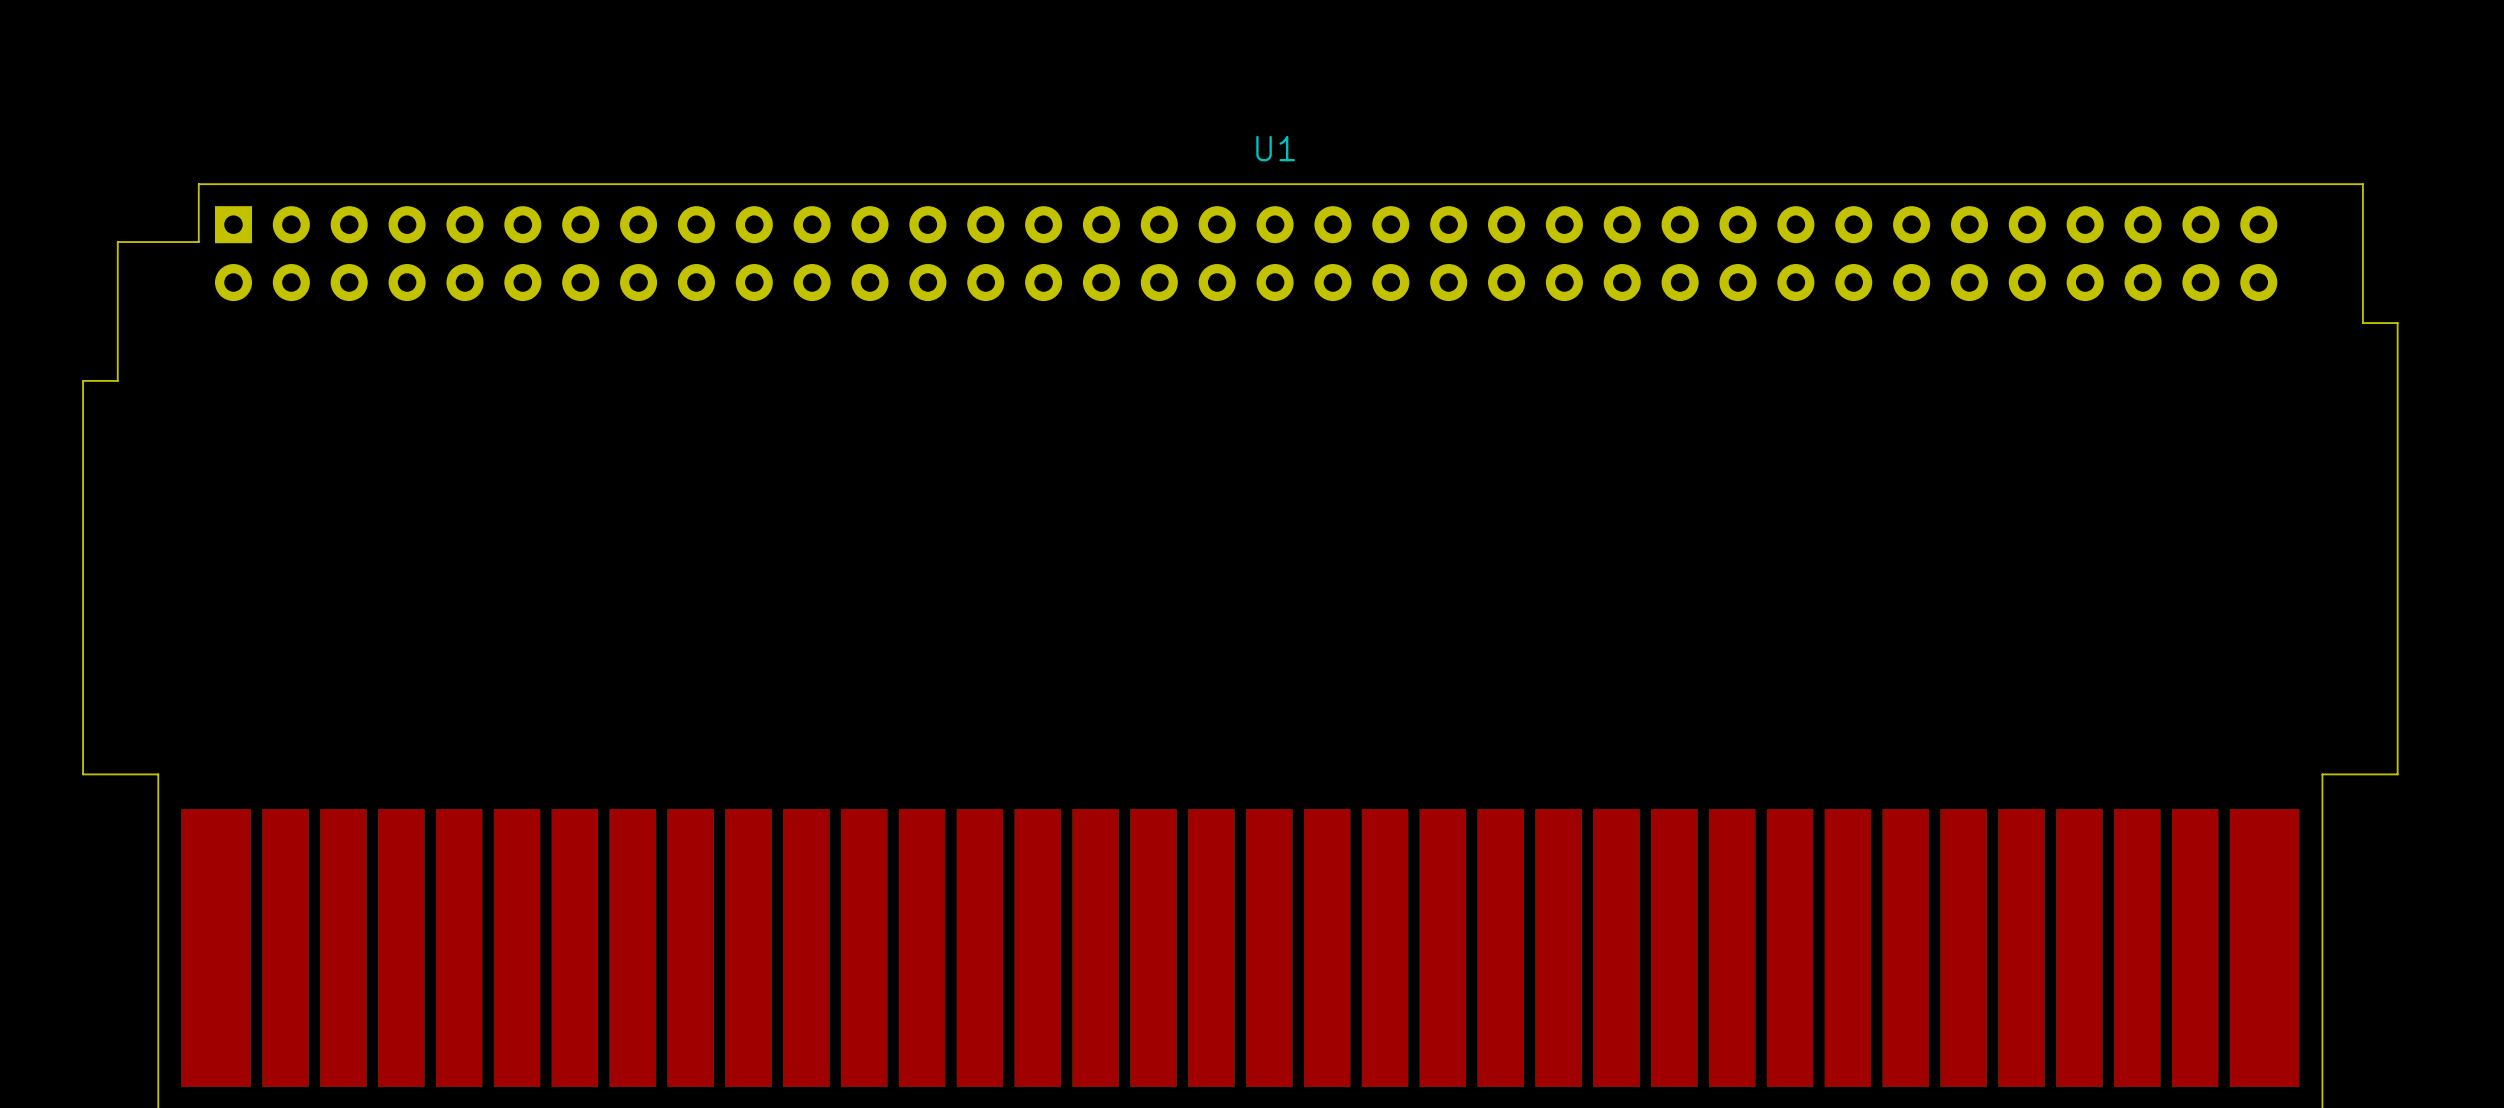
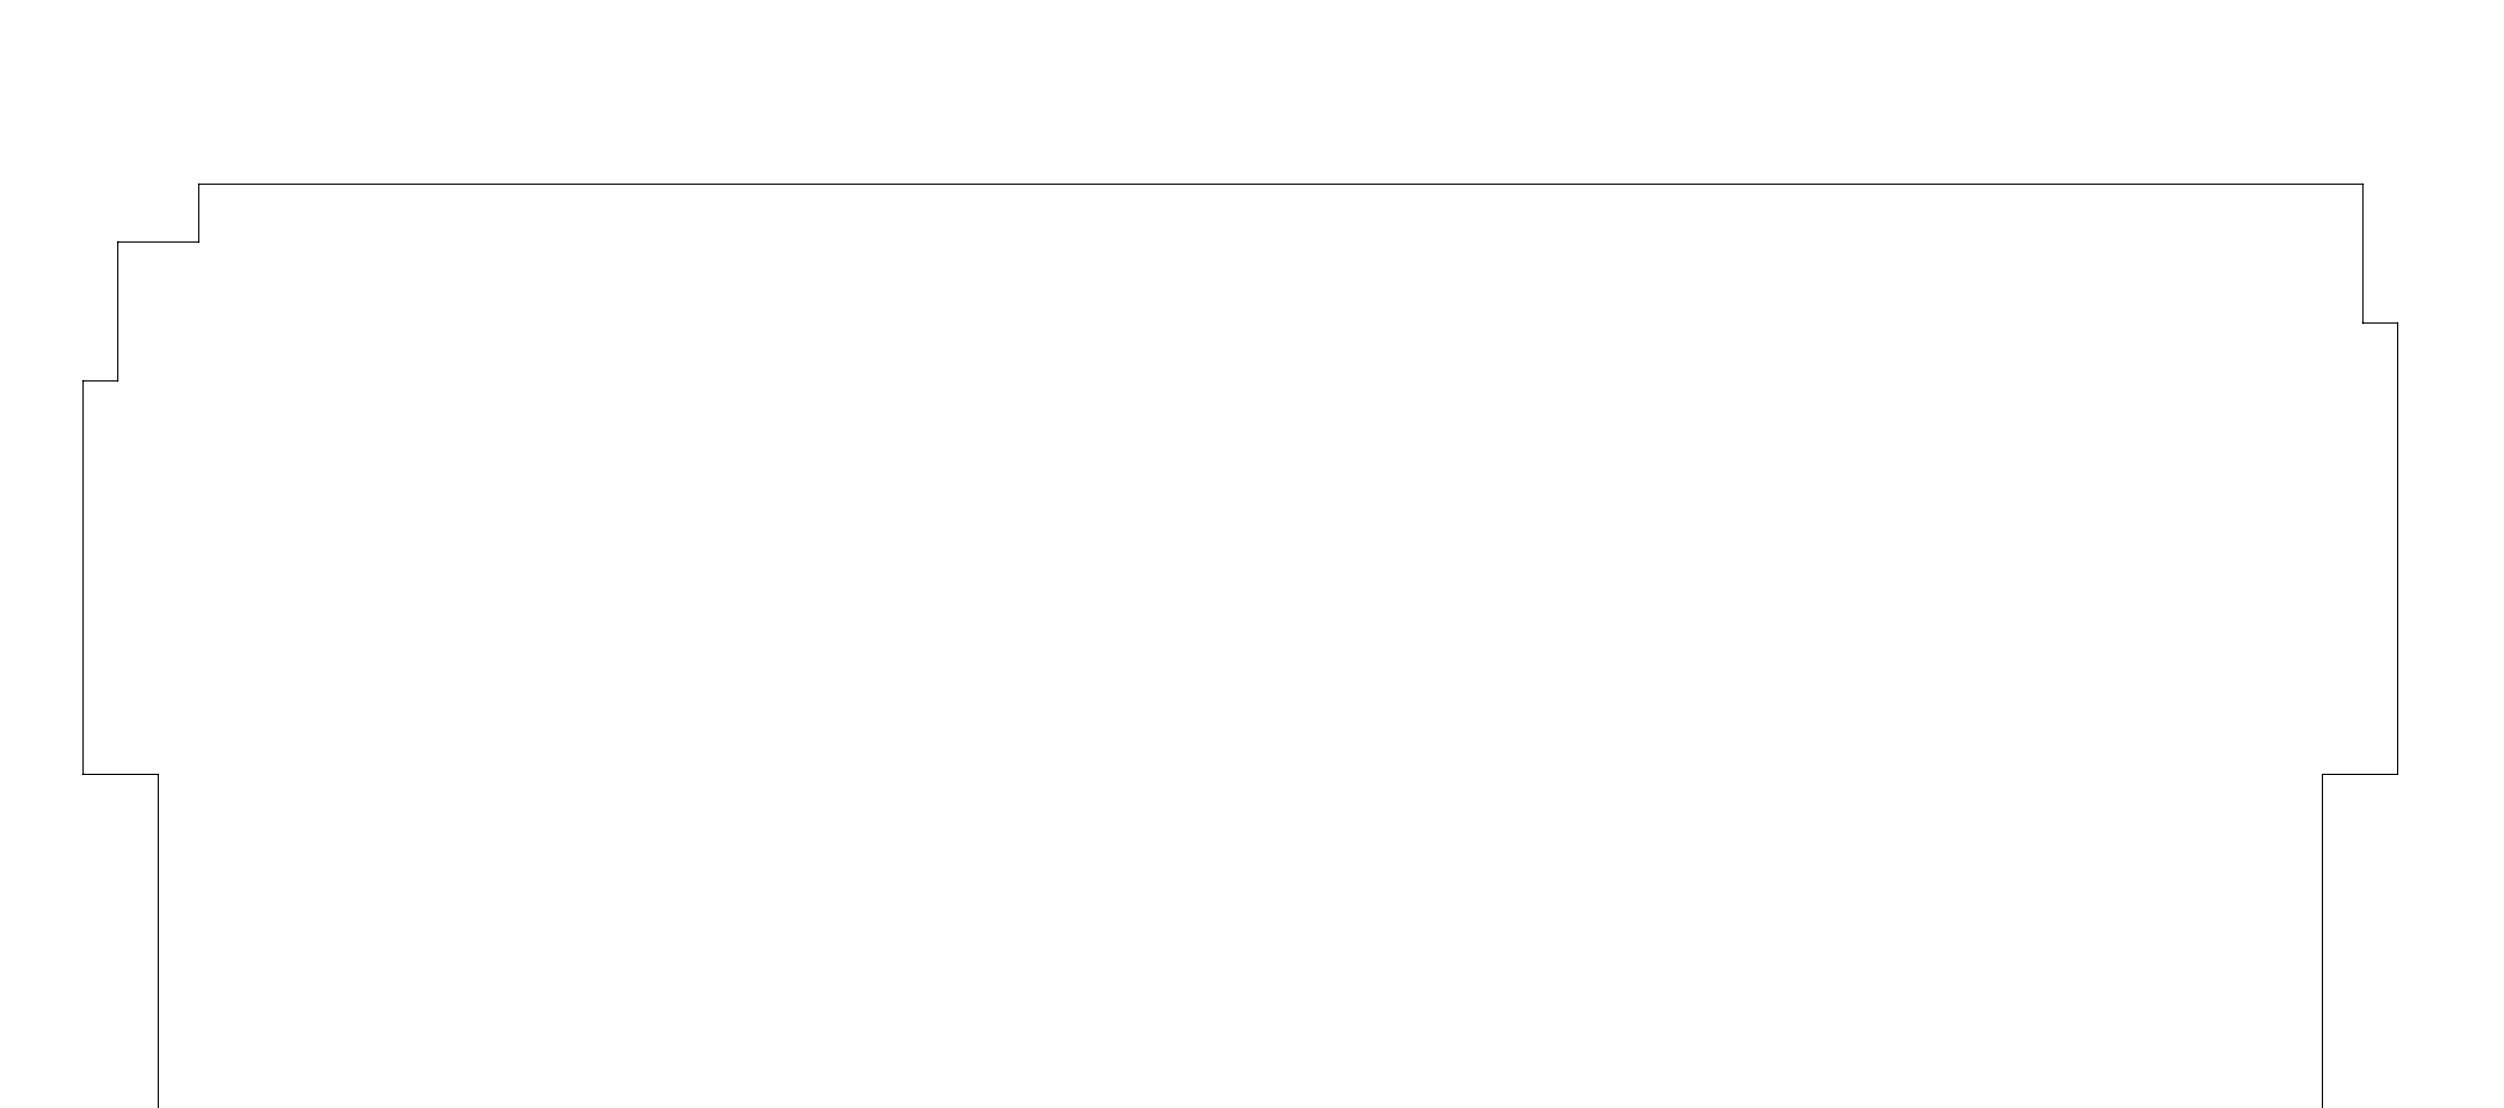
U1: (1246, 253) -> none
part: (1240, 947) -> none

